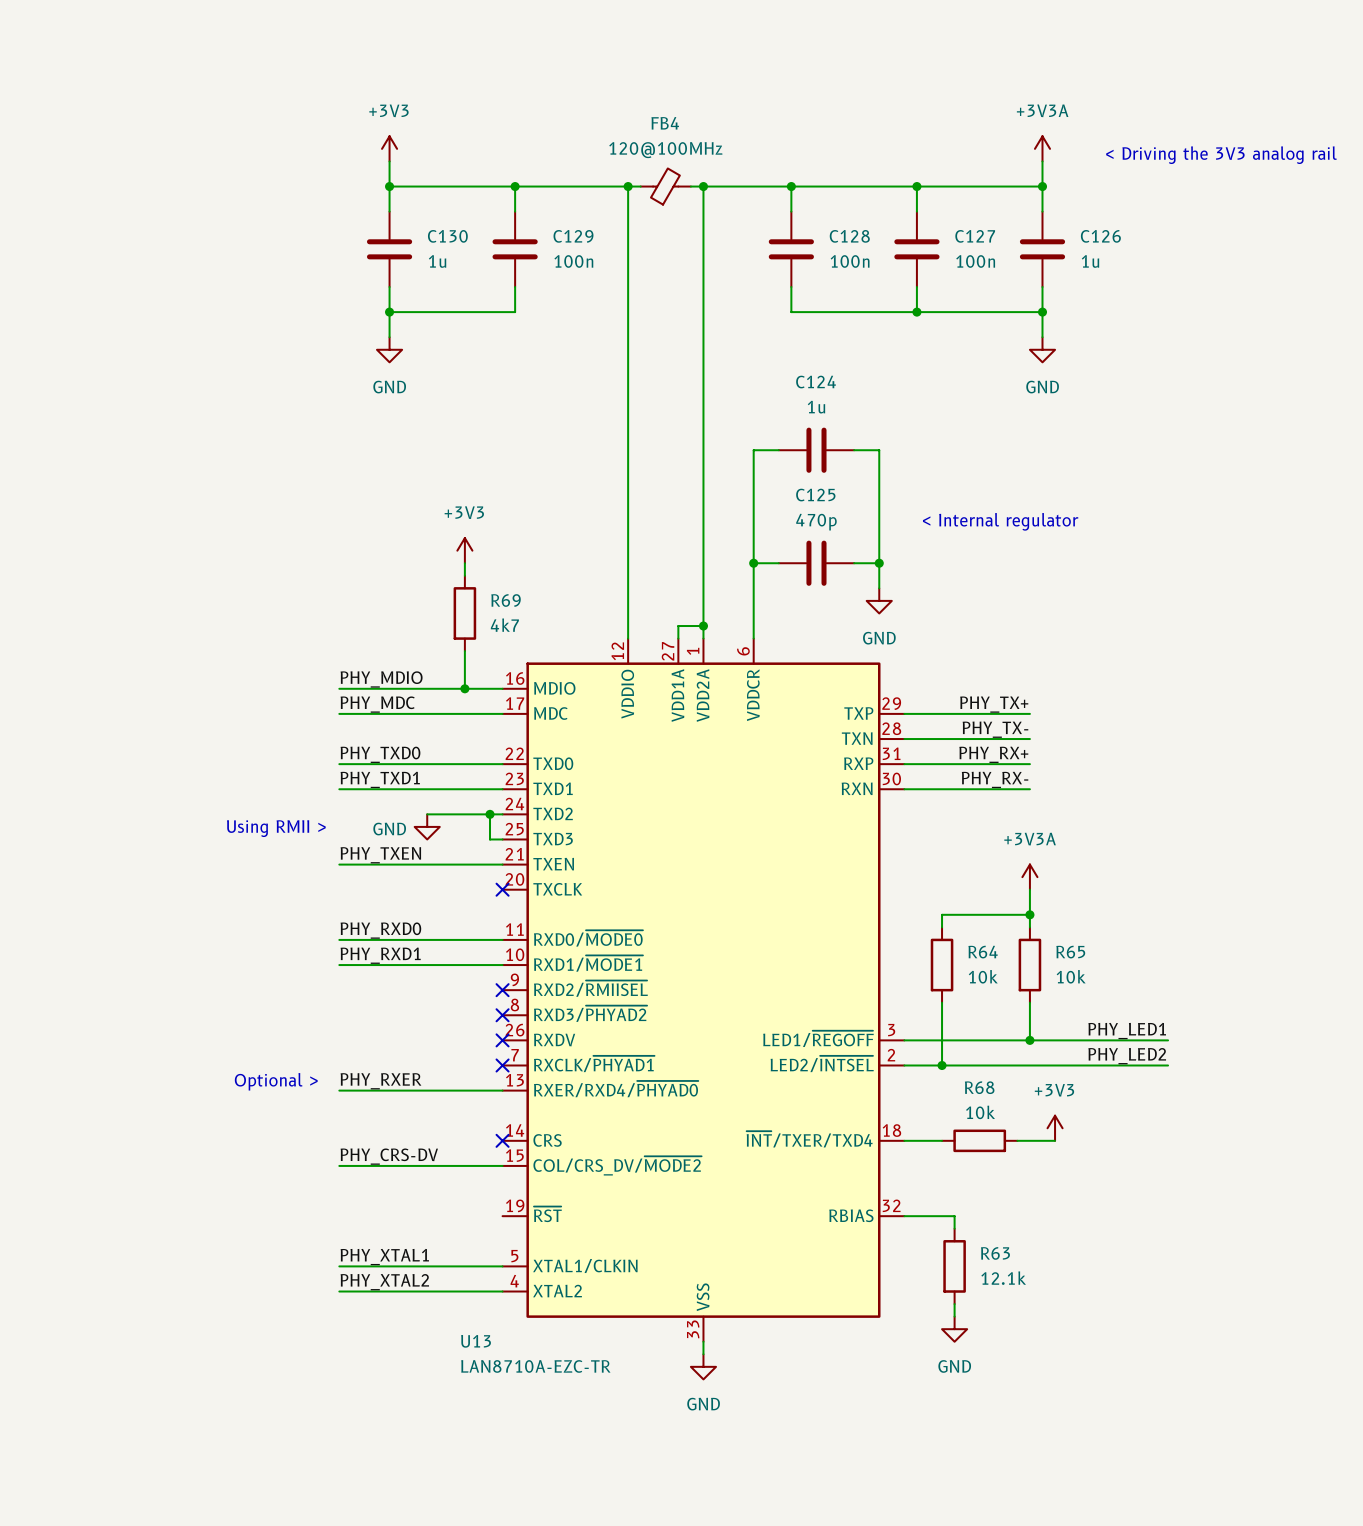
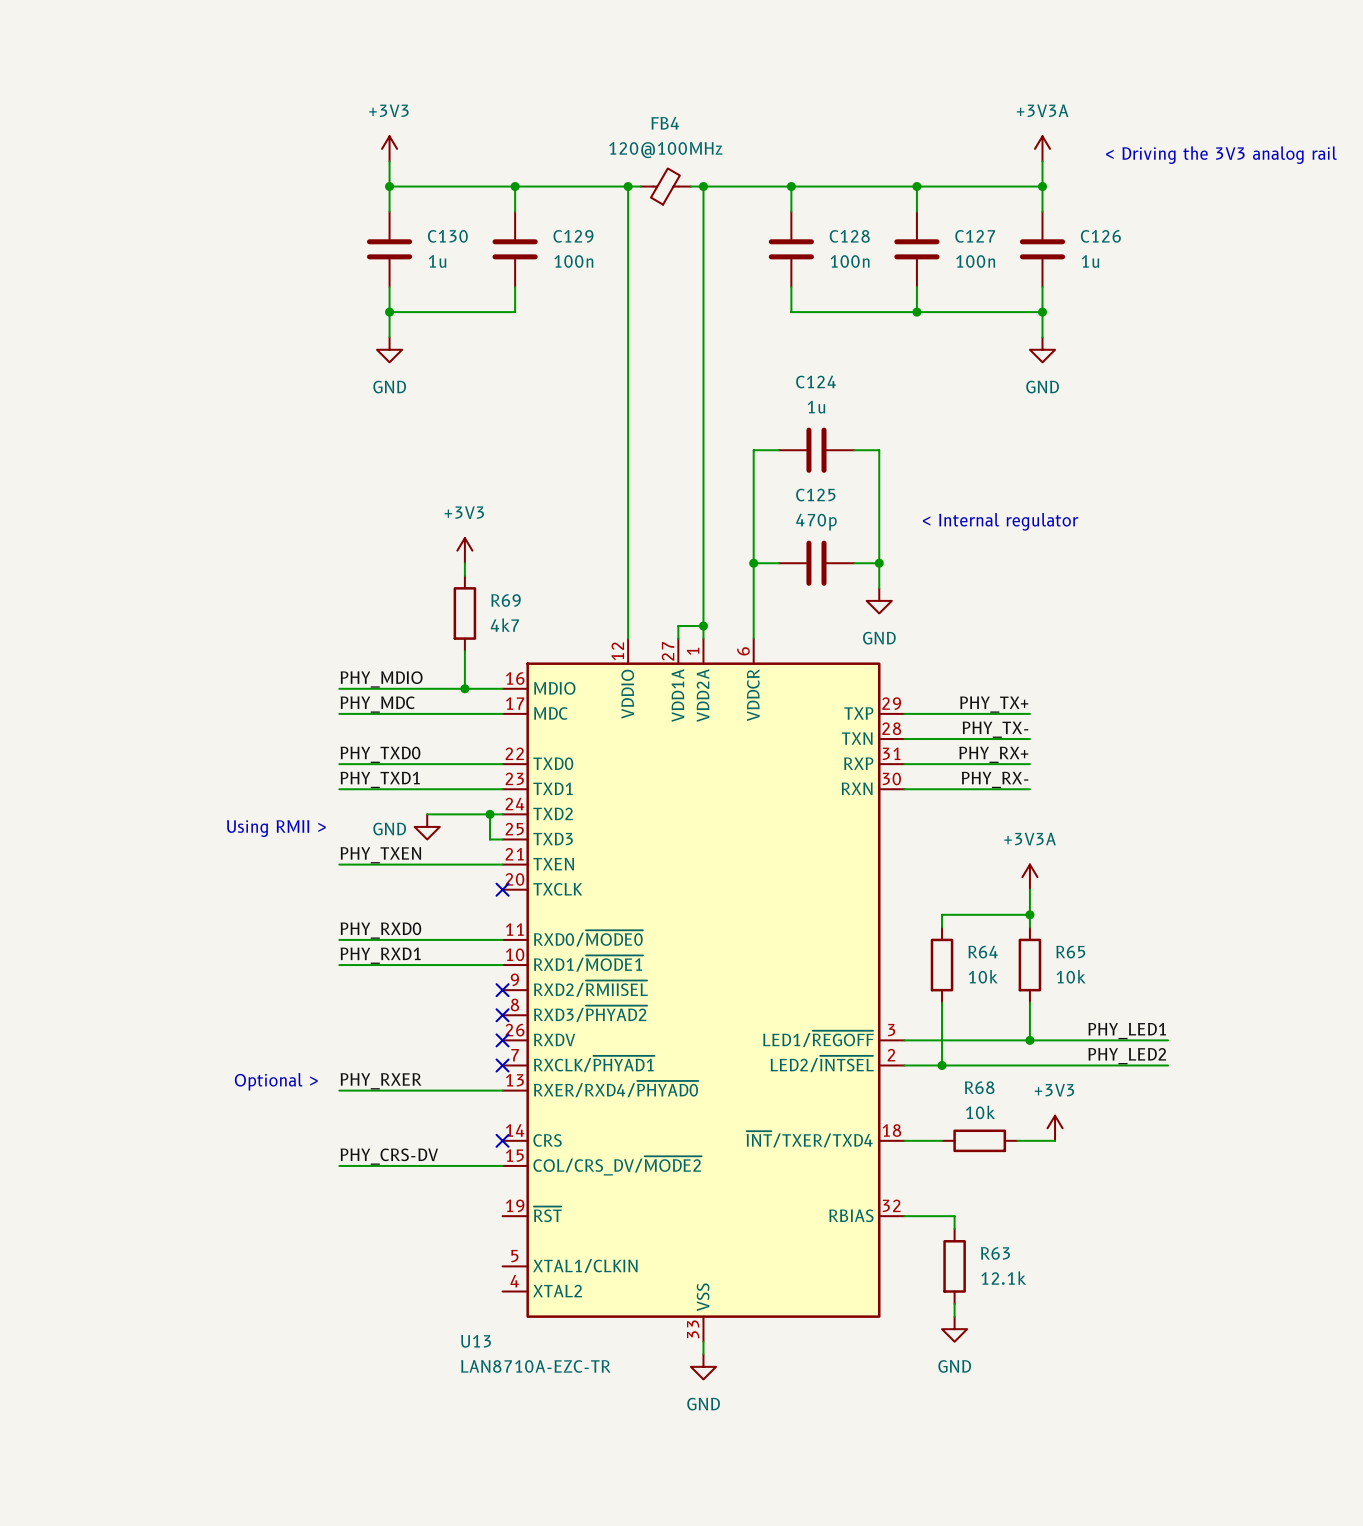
label: PHY_XTAL1 (384, 1257) -> none
wire: (339, 1266) (502, 1266) -> none
label: PHY_XTAL2 (384, 1282) -> none
wire: (339, 1291) (502, 1291) -> none

